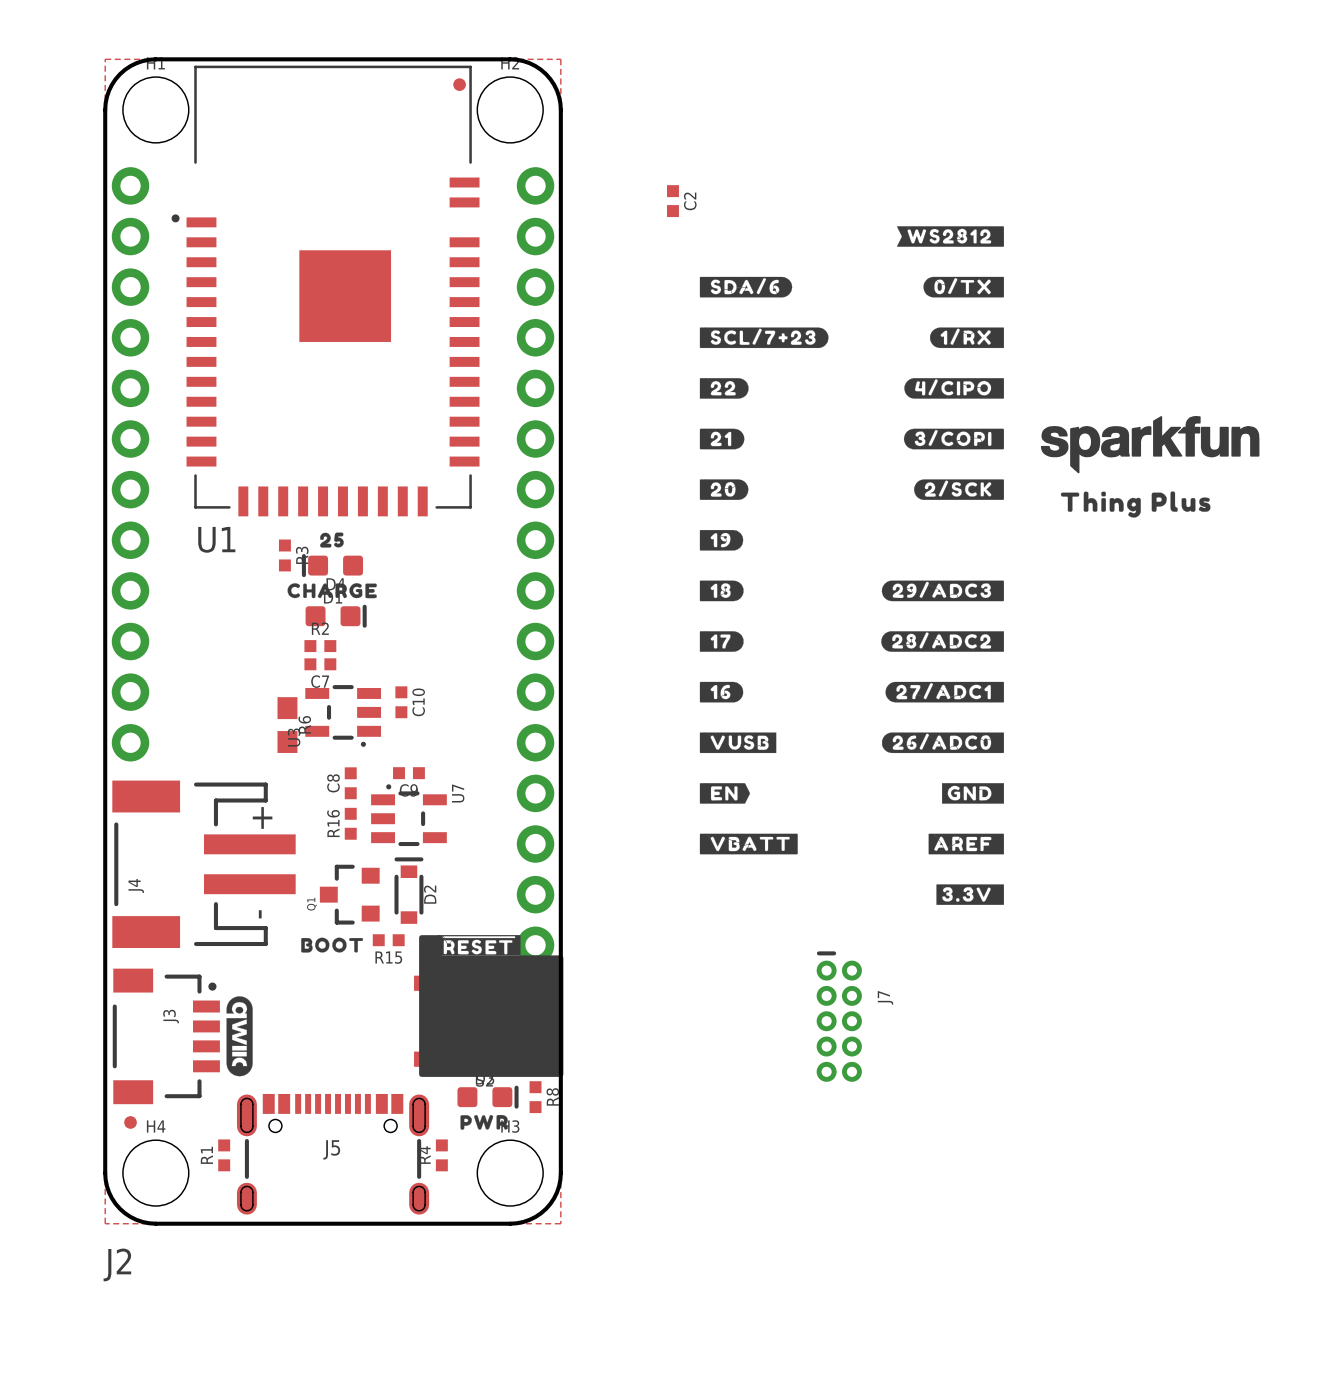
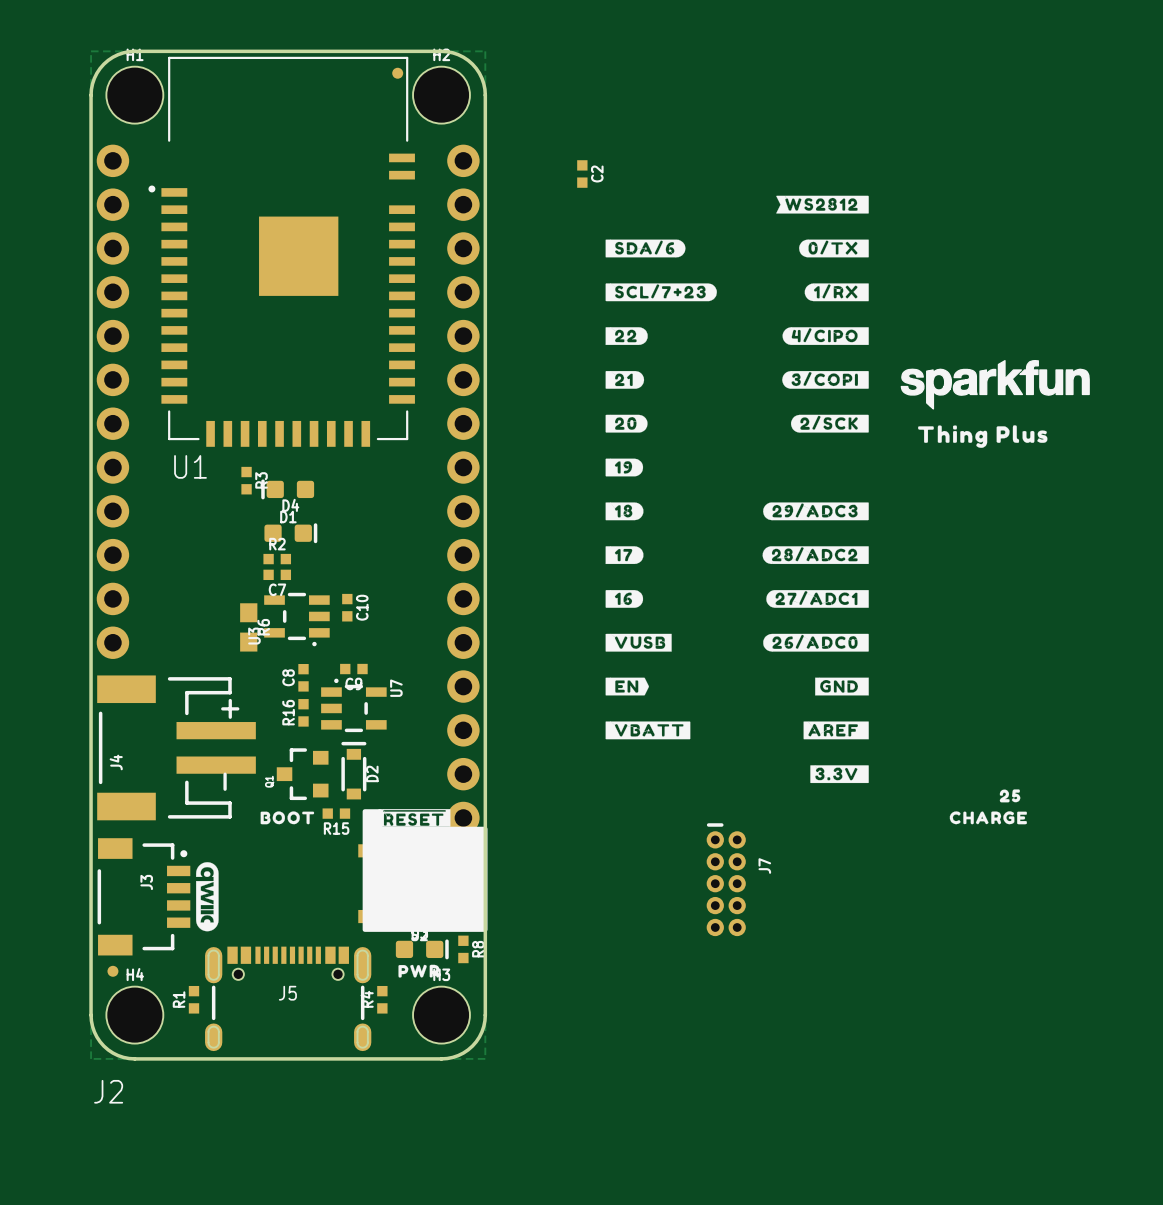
drawing: [320, 532, 344, 548] -> none
drawing: [287, 583, 377, 599] -> none
drawing: none -> [949, 789, 1027, 825]

